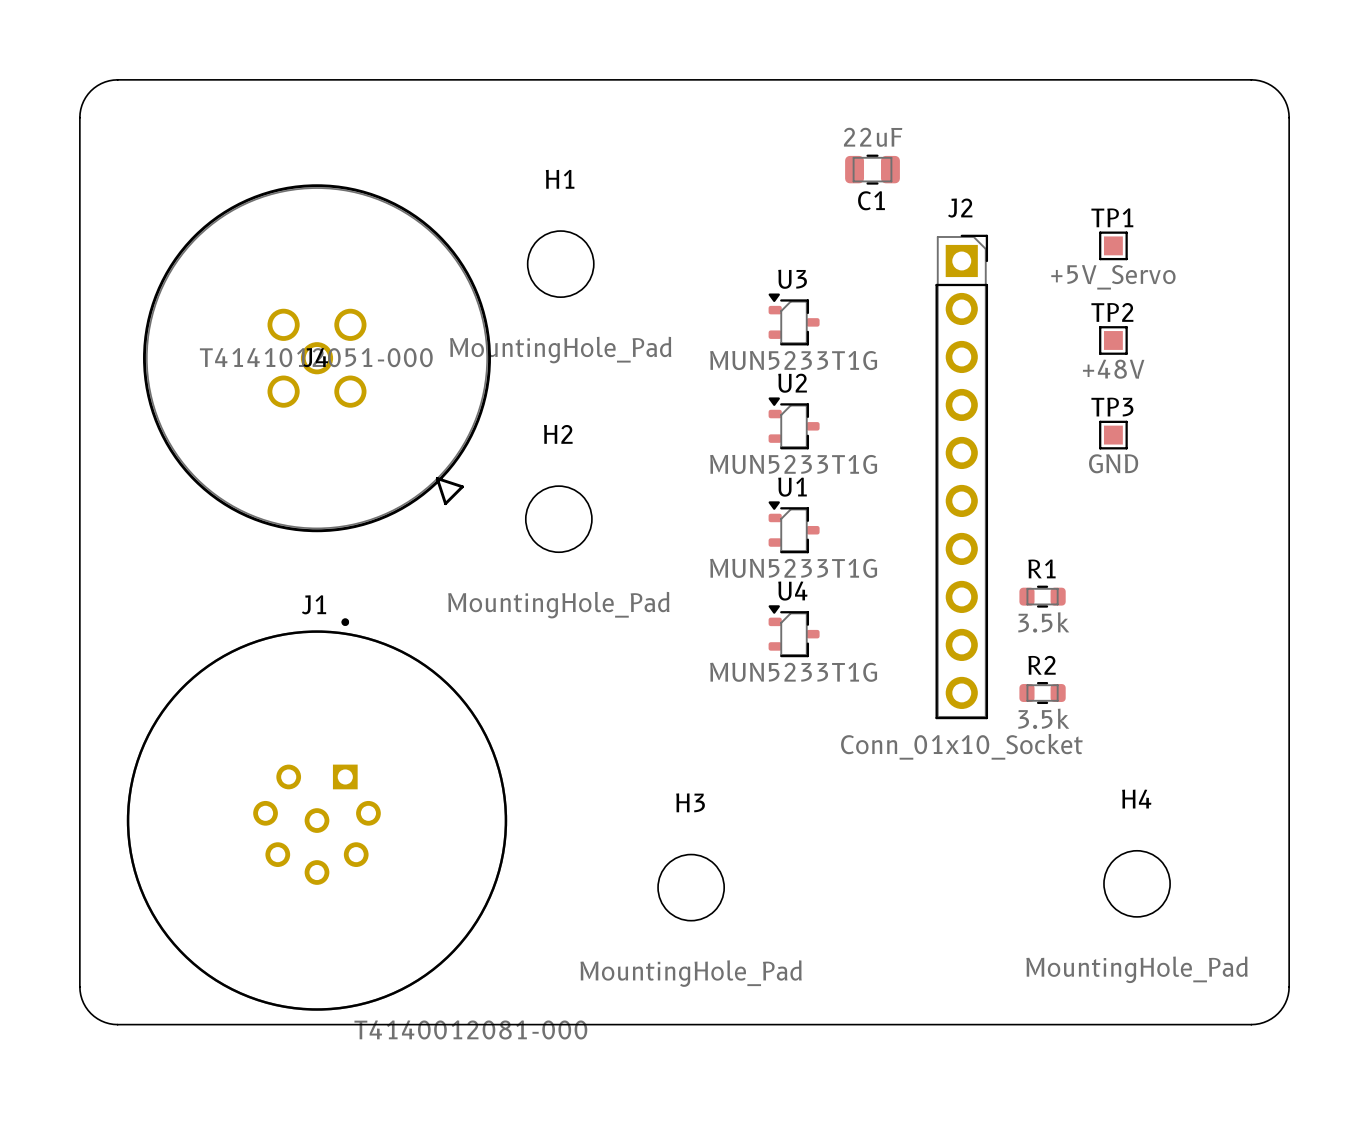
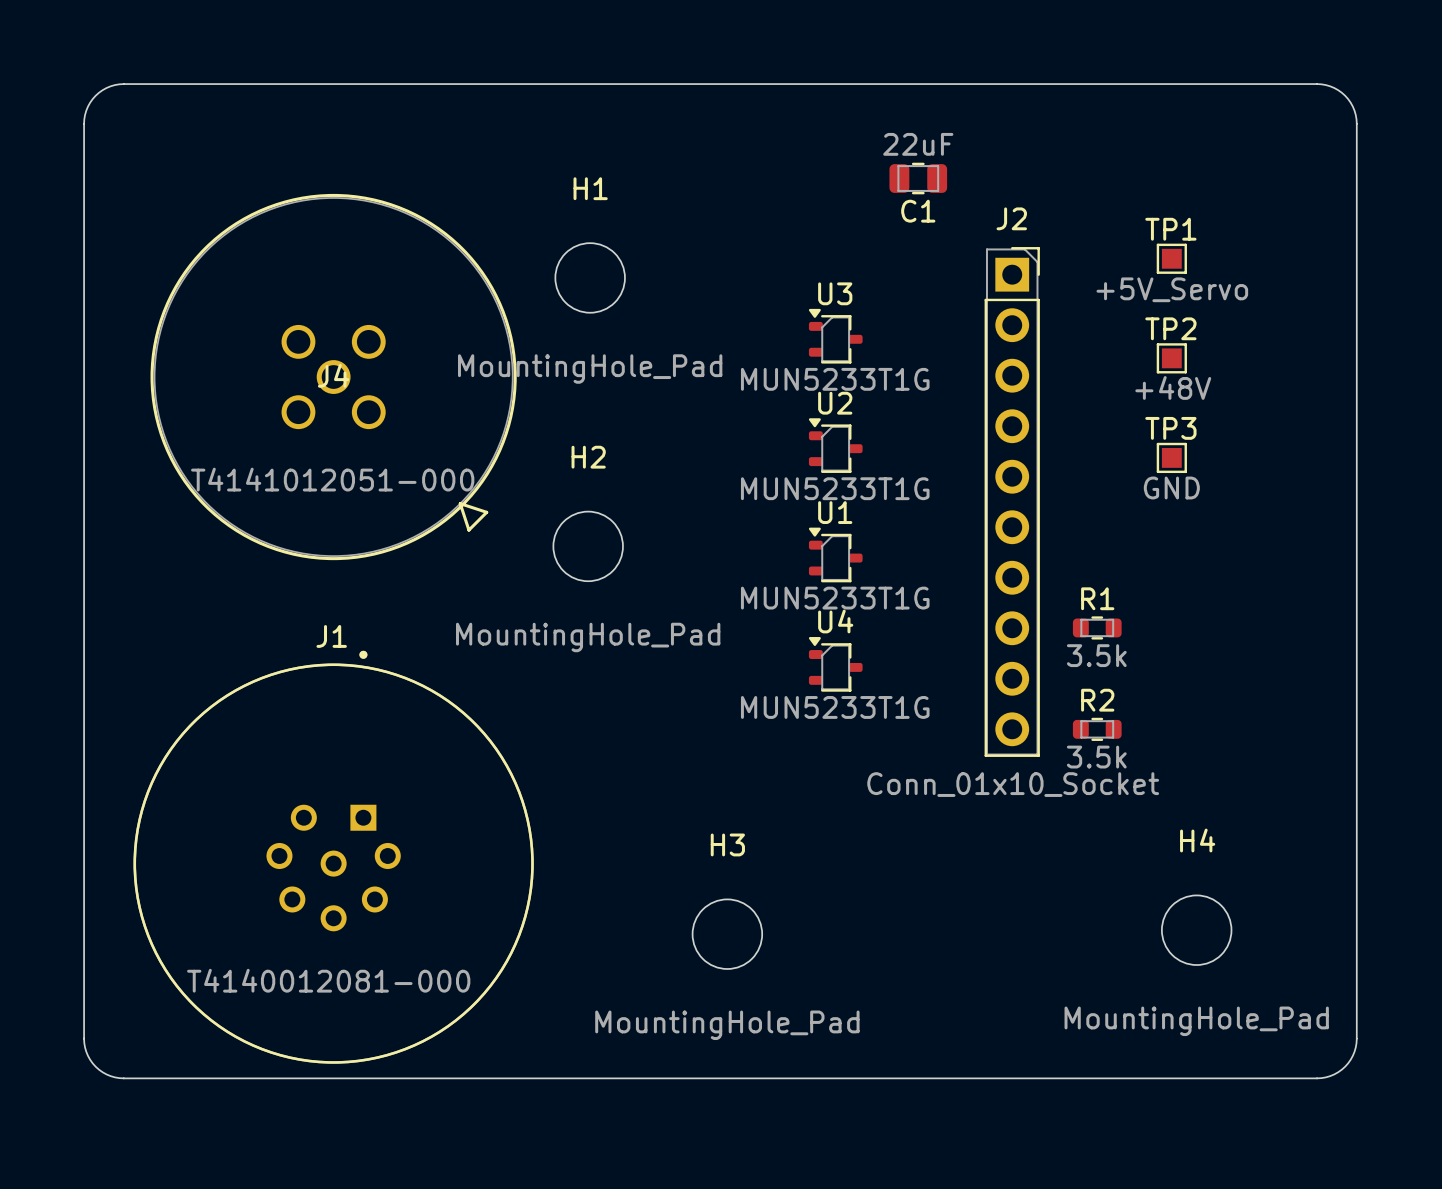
J4 value position: T4141012051-000 (316, 357) -> T4141012051-000 (332, 479)
J1 value position: T4140012081-000 (470, 1029) -> T4140012081-000 (328, 980)

